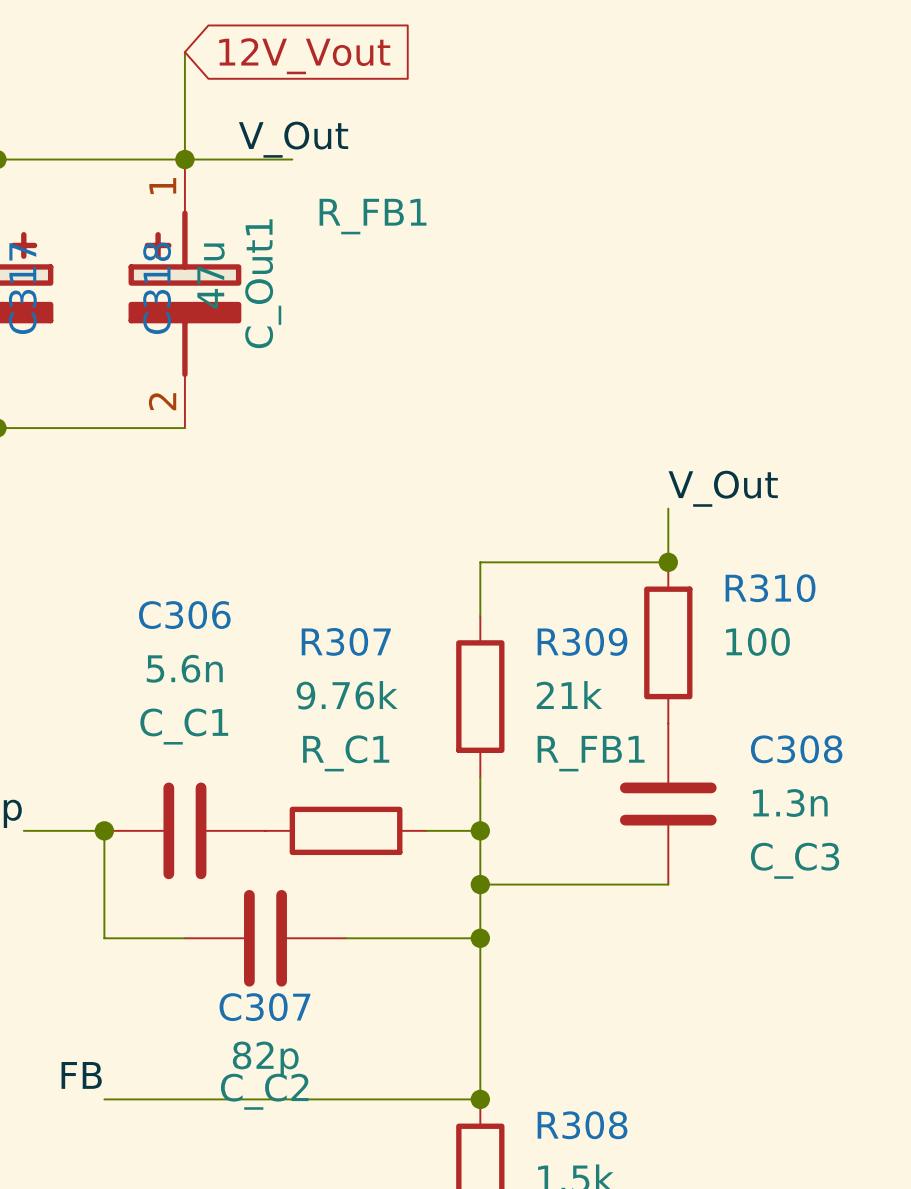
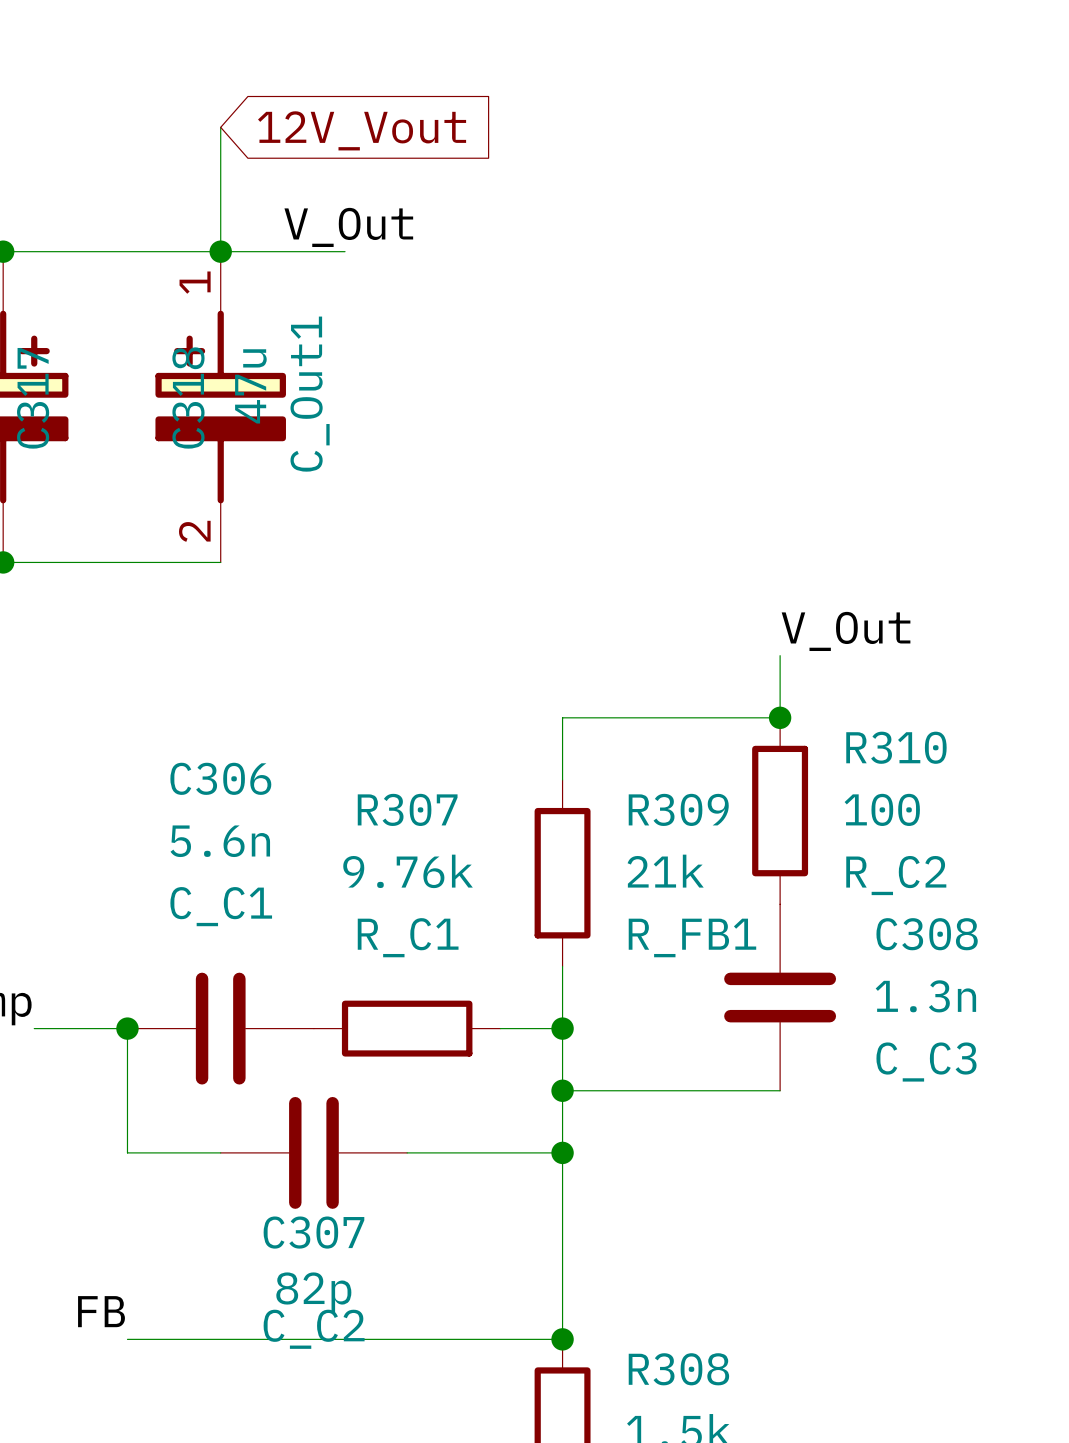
R310 text: R_FB1 (373, 216) -> R_C2 (896, 875)

